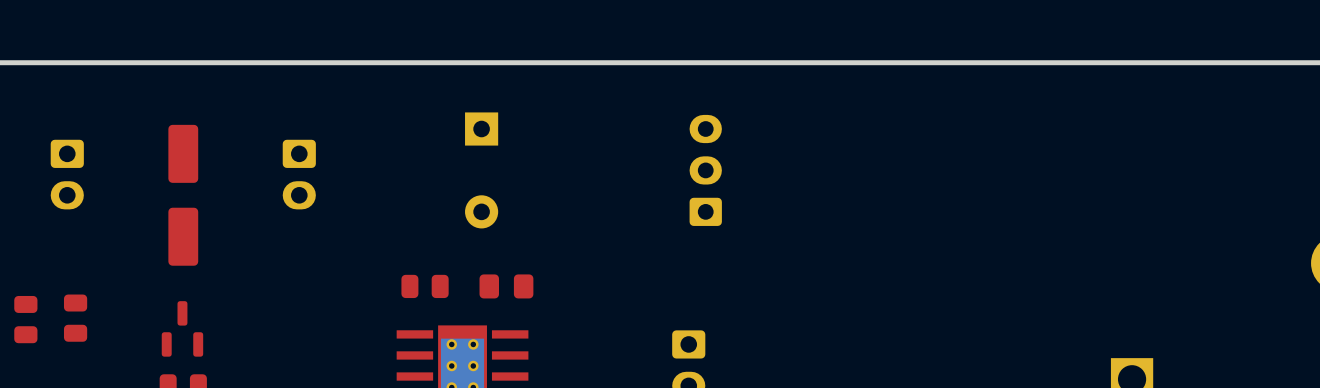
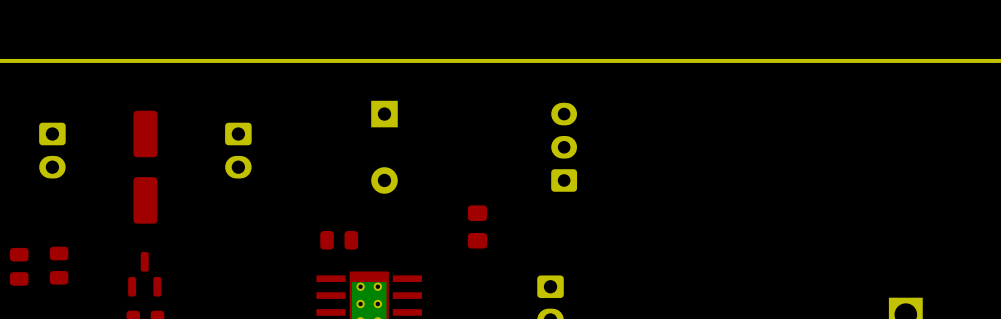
part rotation: 0° (506, 286) -> 90° clockwise (477, 226)
part position: (506, 286) -> (477, 226)

